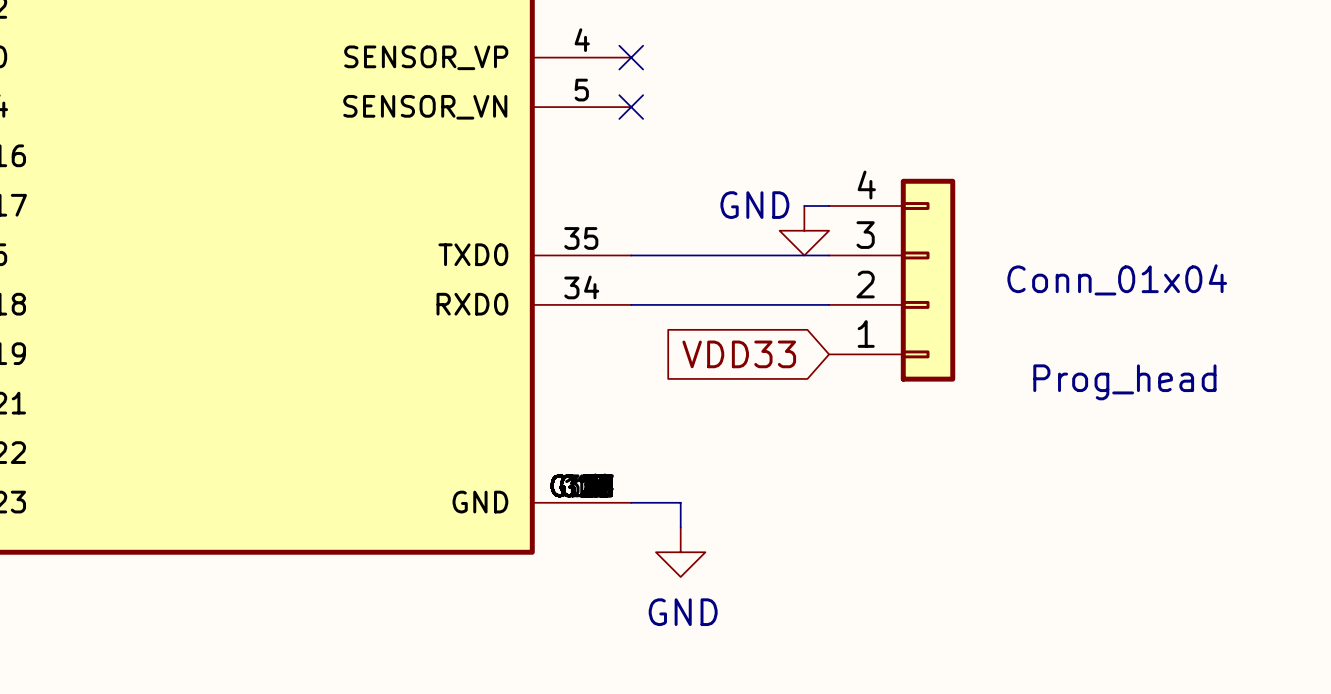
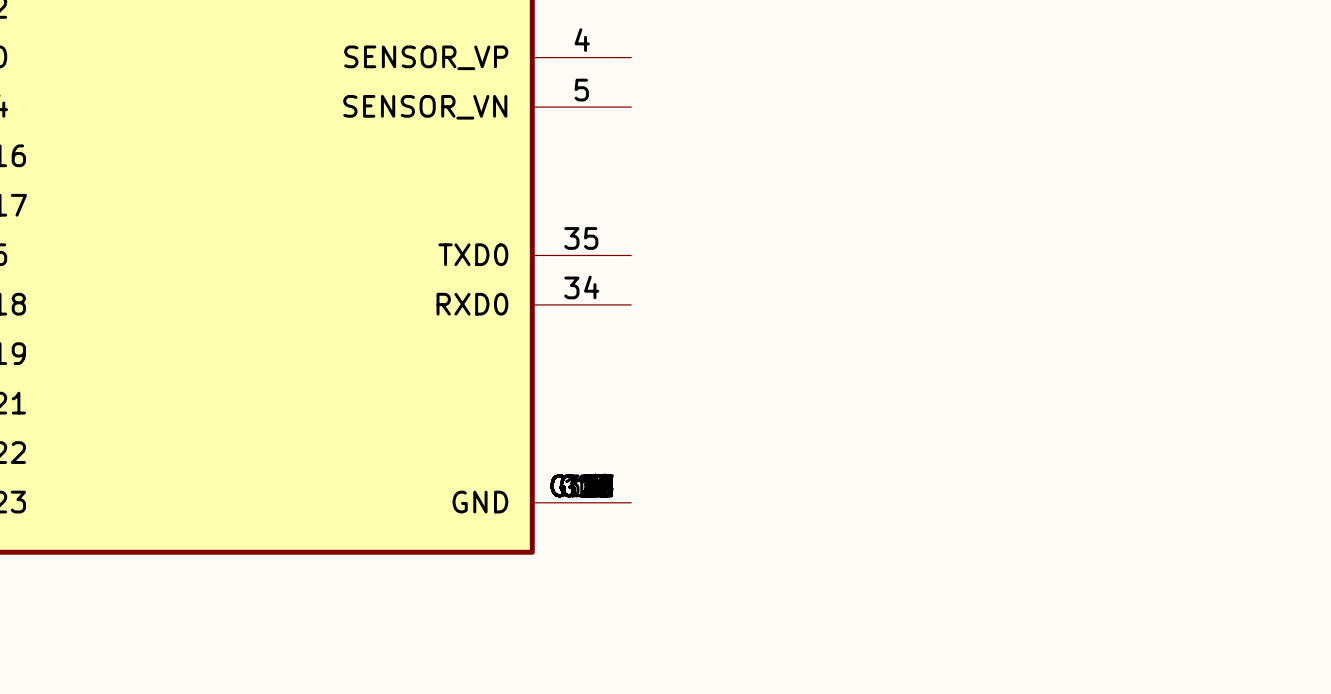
no-connect mark: (631, 57) -> none
no-connect mark: (631, 107) -> none
wire: (804, 206) (829, 206) -> none
power symbol: GND (804, 230) -> none
wire: (631, 255) (829, 255) -> none
Prog_head: Conn_01x04 (892, 280) -> none
wire: (631, 304) (829, 304) -> none
global label: VDD33 (739, 354) -> none
wire: (631, 502) (680, 502) (680, 527) -> none
power symbol: GND (680, 552) -> none

